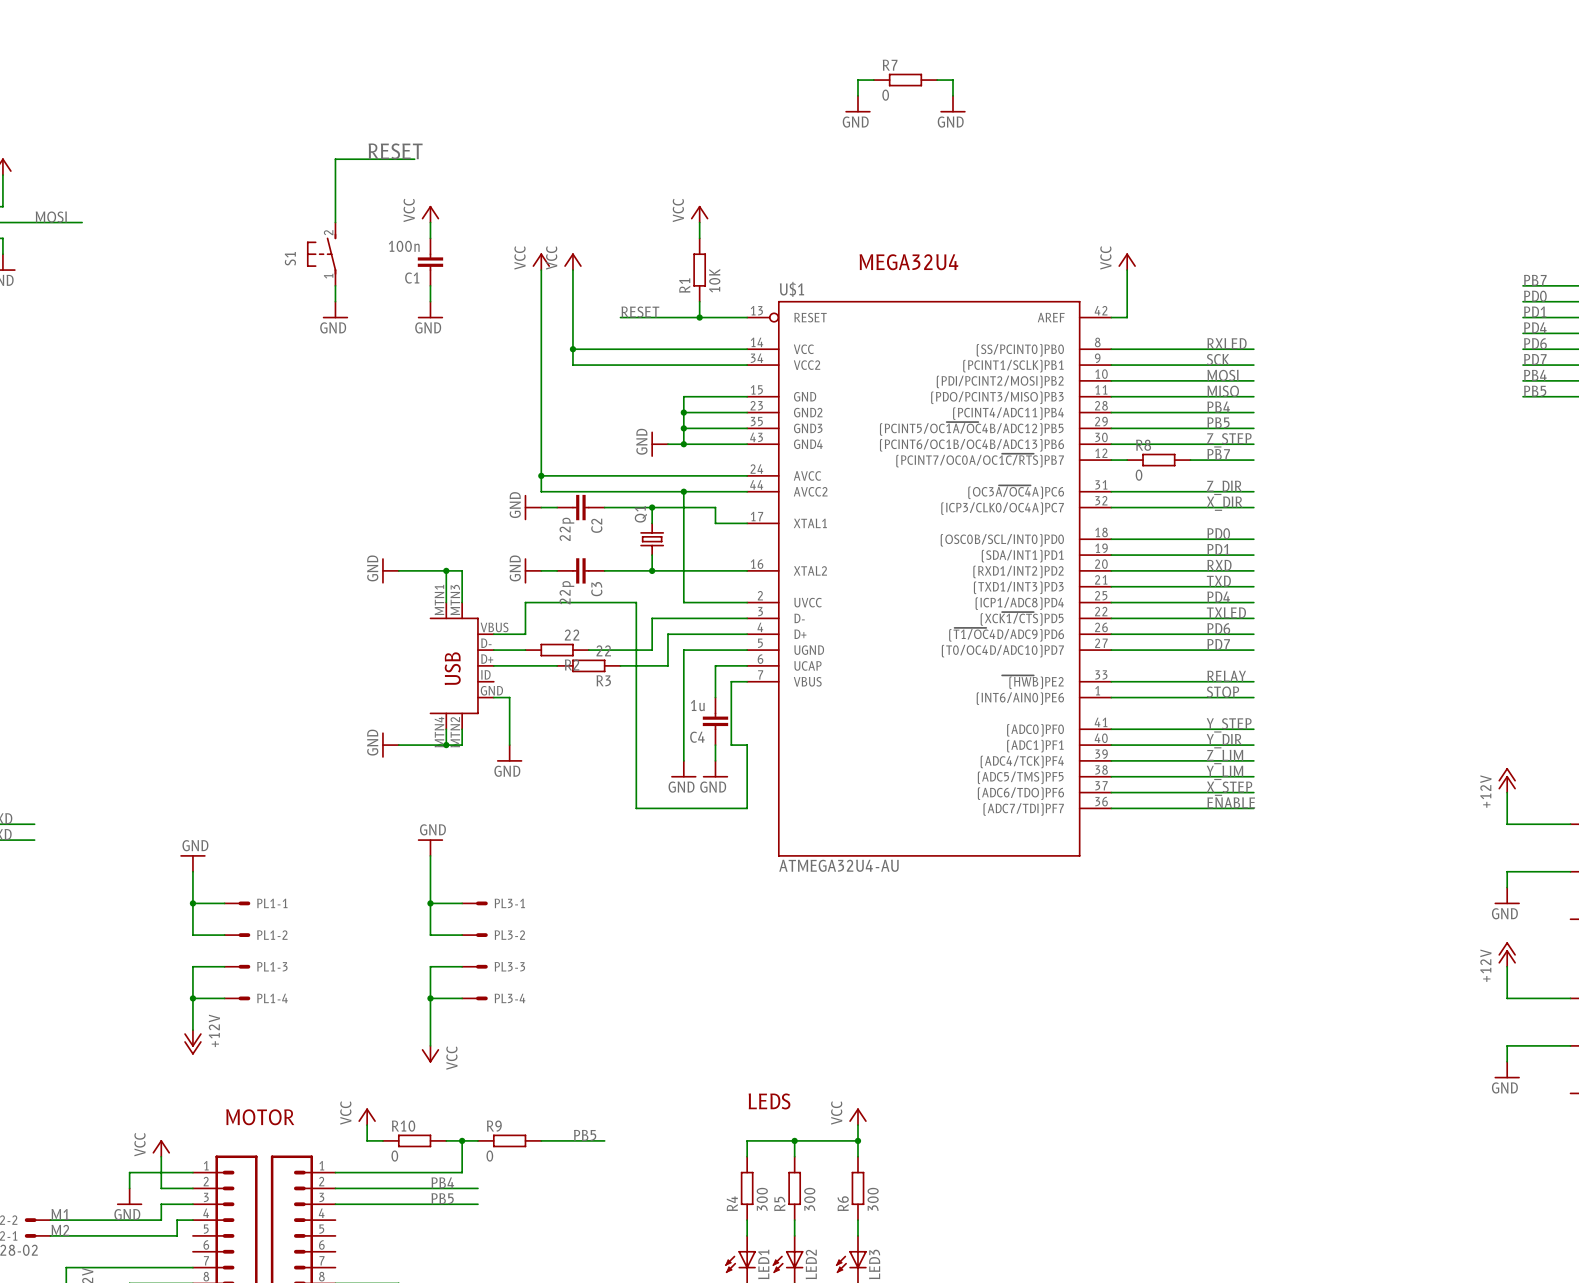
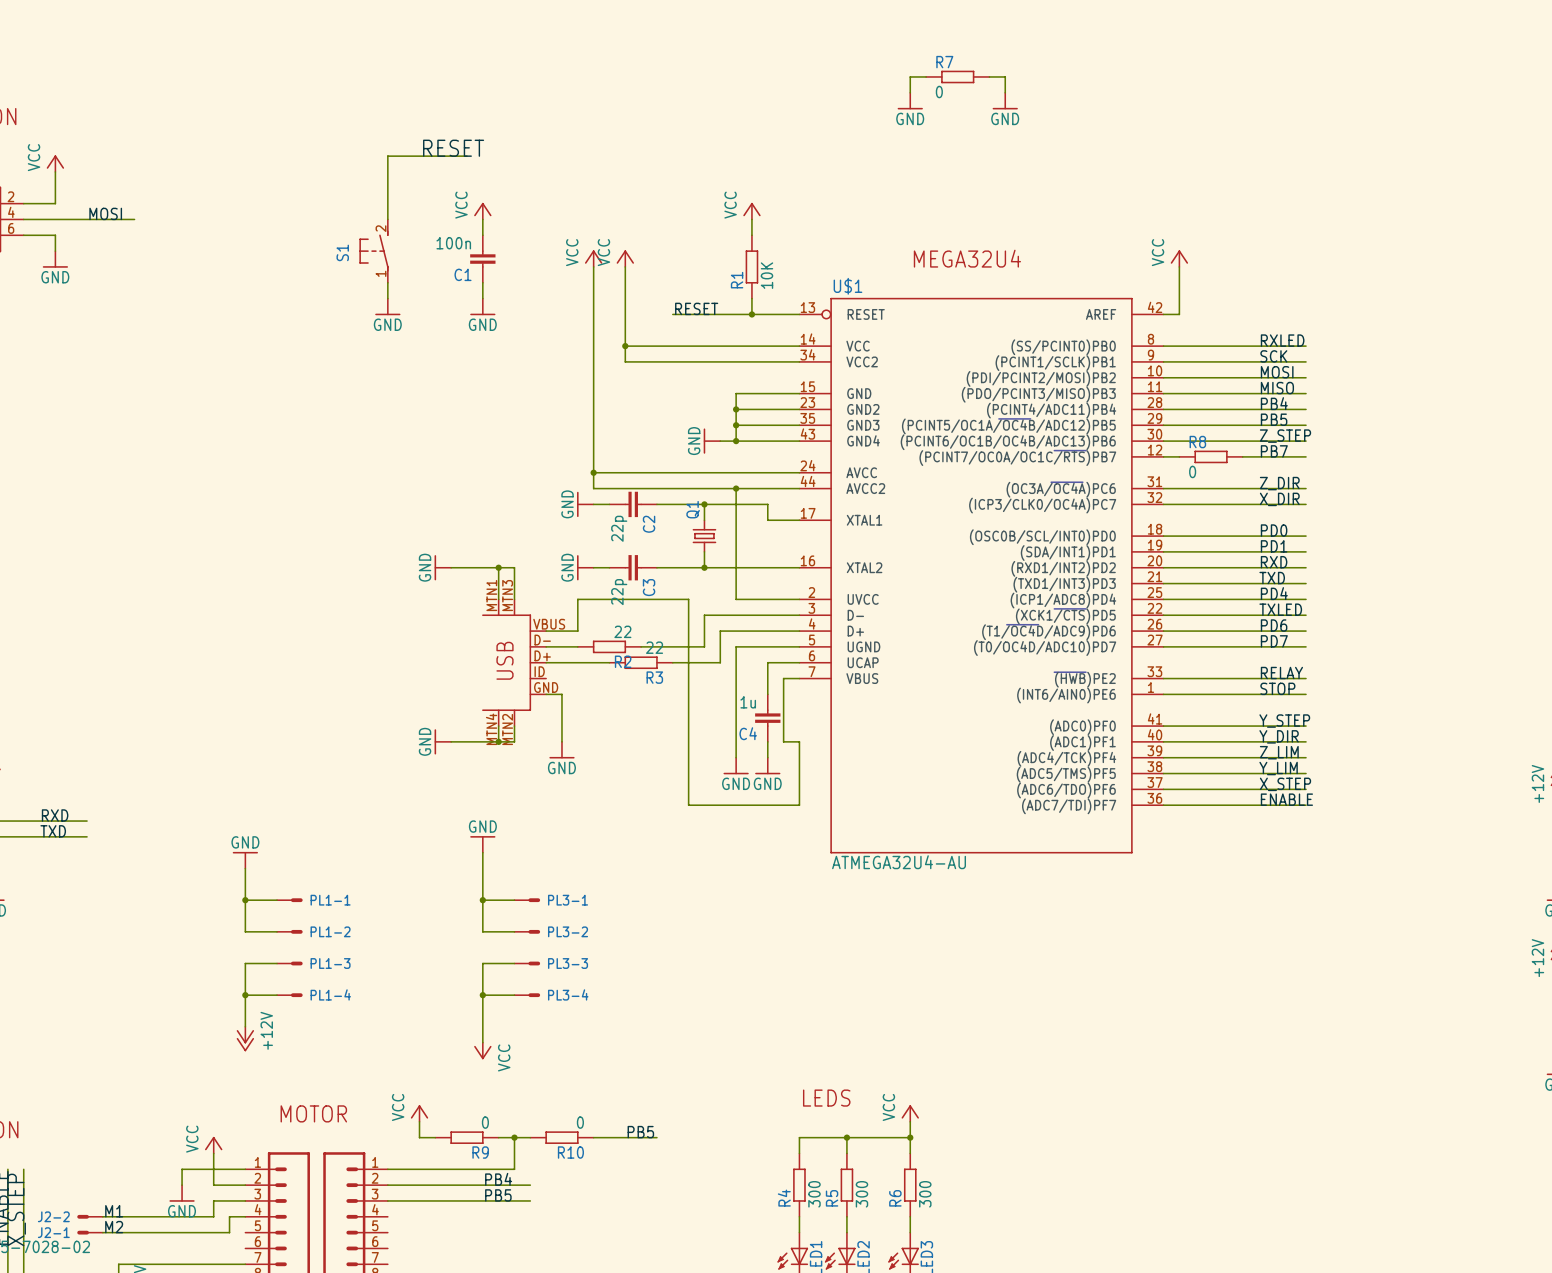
R10 name: R10 (403, 1126) -> R9 (480, 1152)
R9 name: R9 (494, 1126) -> R10 (570, 1152)
R10 value position: 0 (394, 1156) -> 0 (485, 1122)
R9 value position: 0 (489, 1156) -> 0 (580, 1122)

